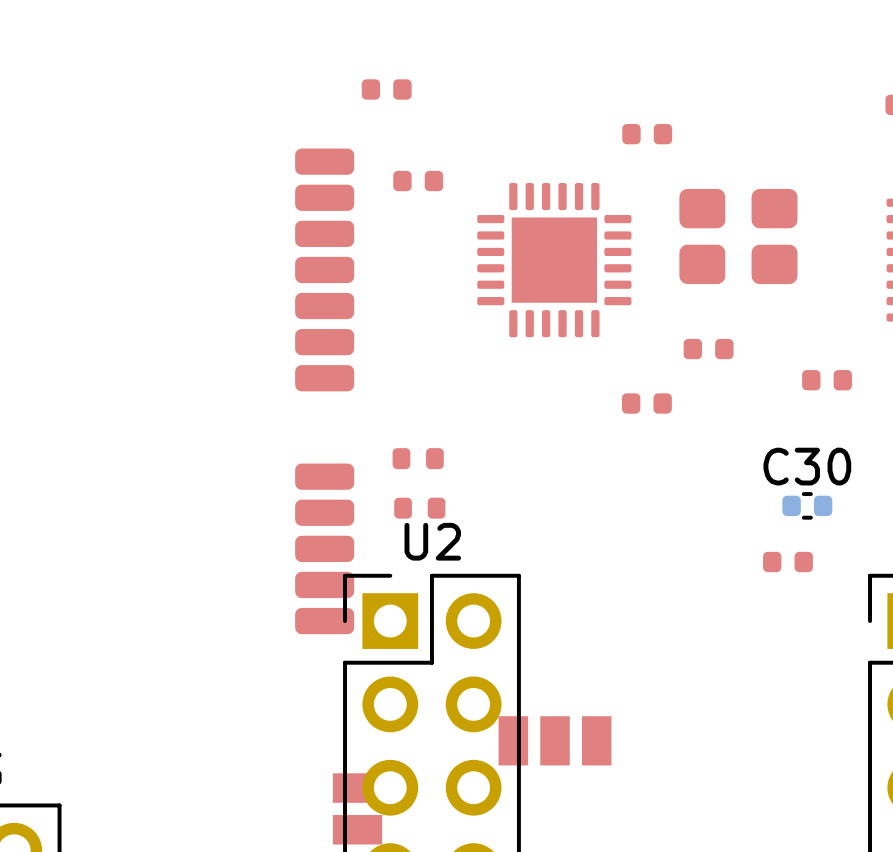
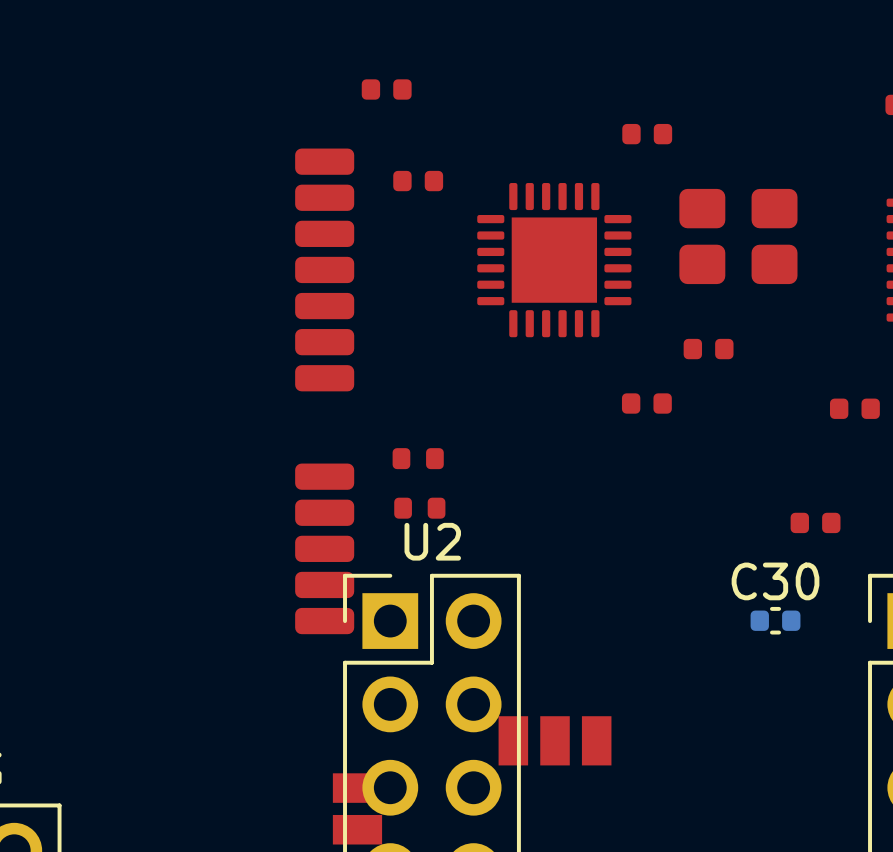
part position: (827, 380) -> (854, 408)
C30 position: (807, 505) -> (775, 620)
part position: (787, 561) -> (815, 522)

